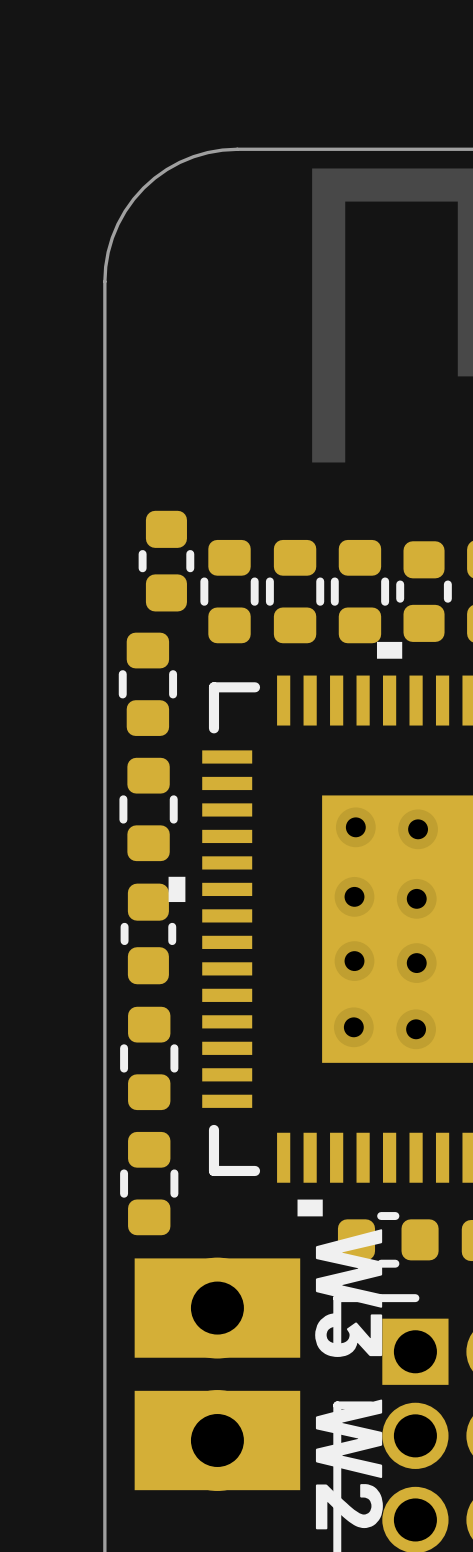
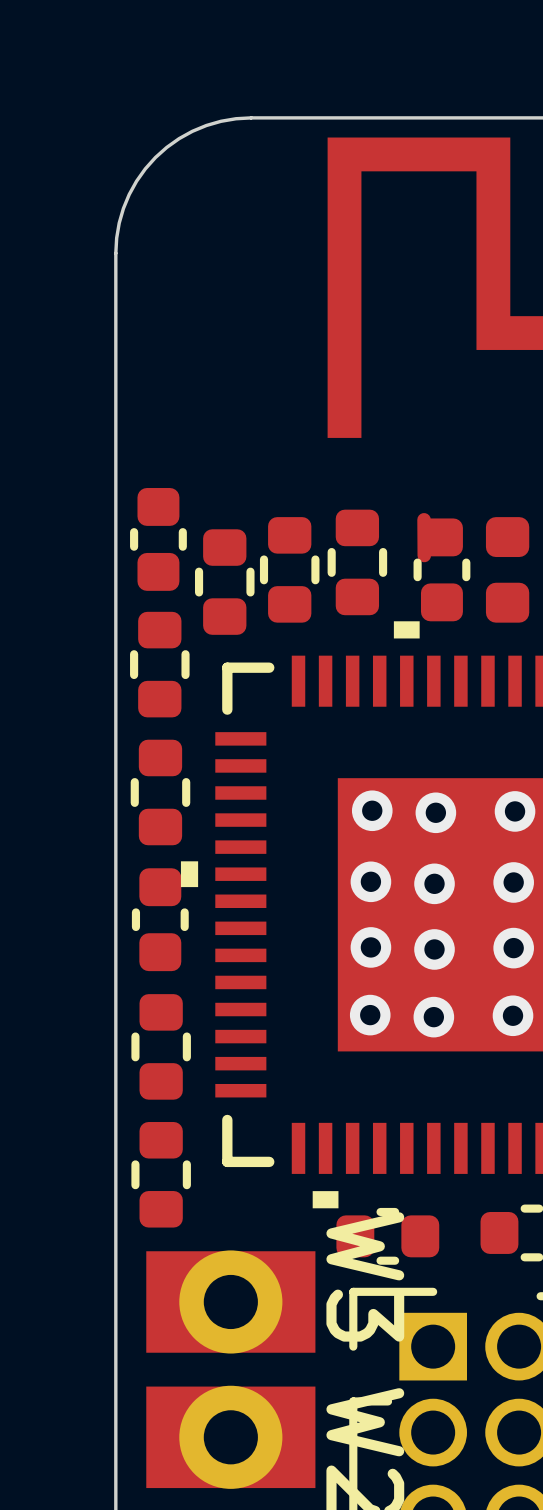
track: none -> (424, 519) (424, 555)
part position: (166, 561) -> (158, 539)
part position: (229, 591) -> (224, 582)
part position: (295, 591) -> (289, 569)
part position: (359, 591) -> (357, 562)
part position: (388, 1239) -> (387, 1236)

